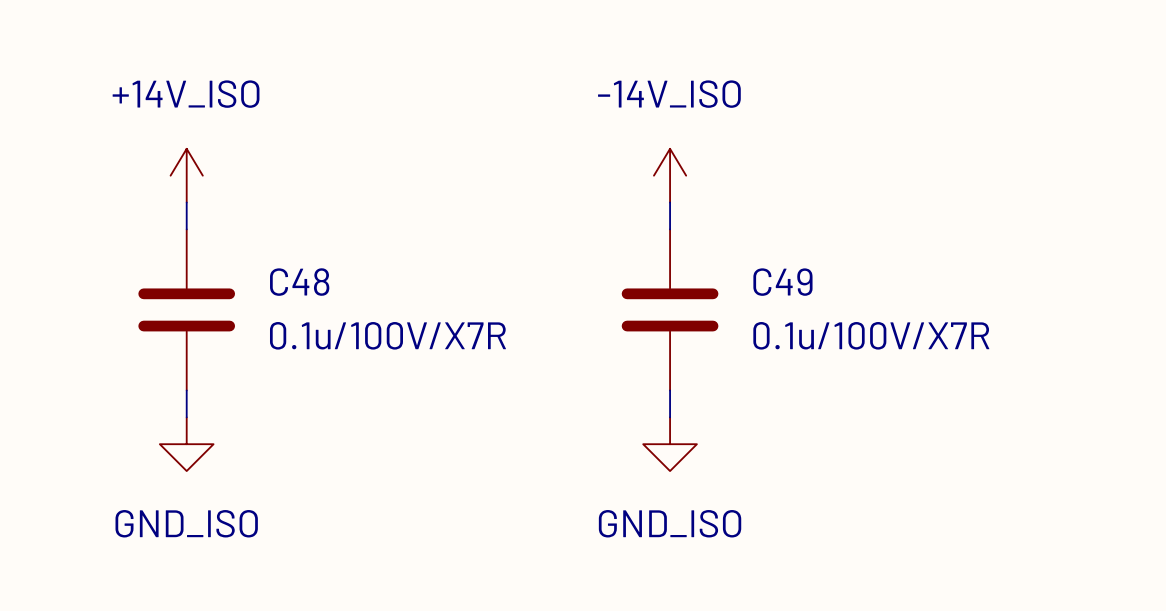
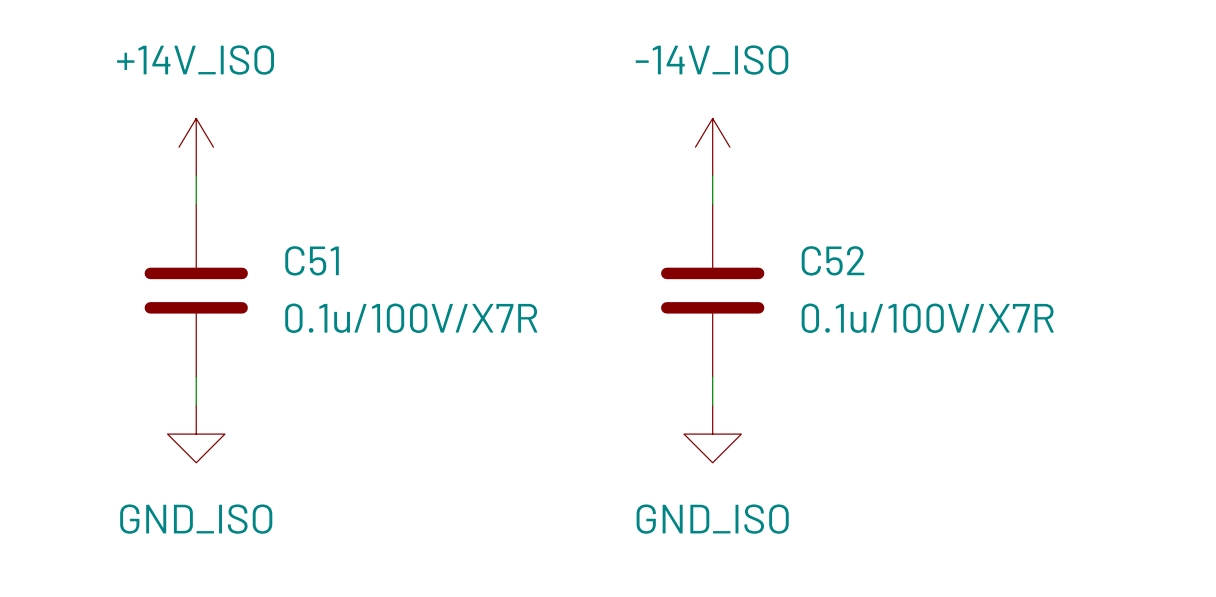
C48 name: C48 (299, 282) -> C51 (312, 260)
C49 name: C49 (782, 282) -> C52 (833, 260)

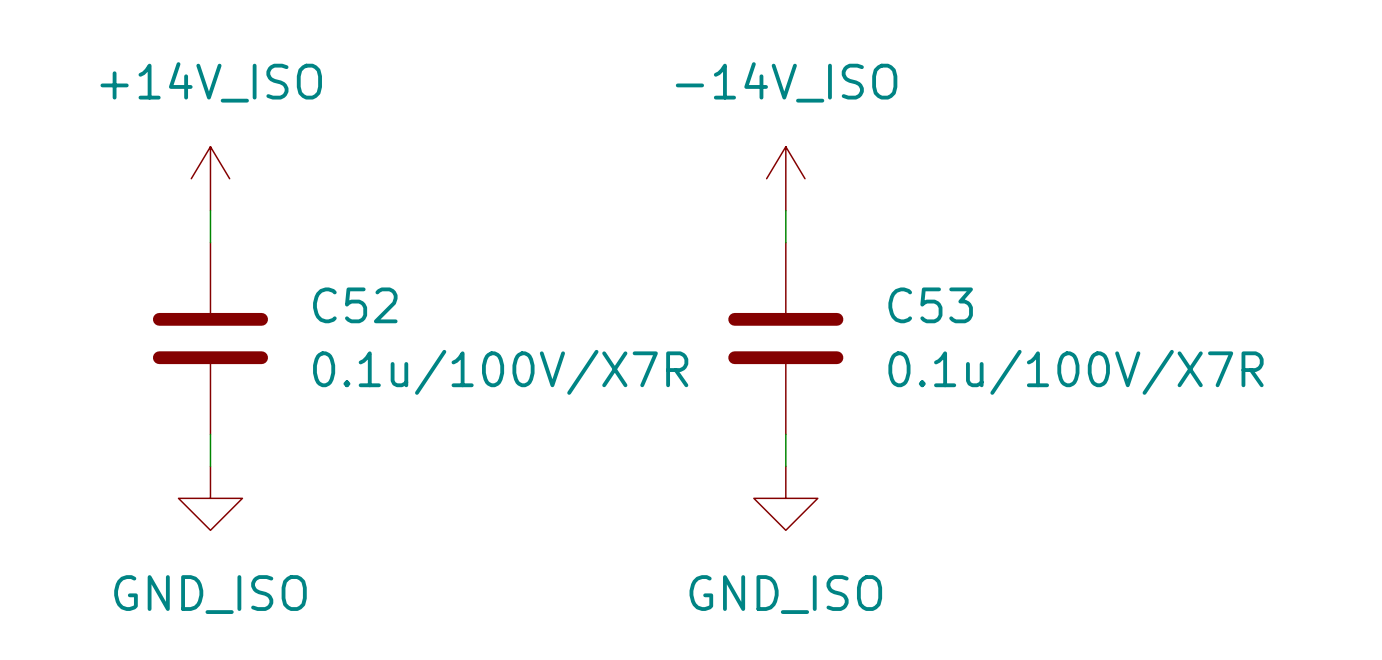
C51 name: C51 (312, 260) -> C52 (355, 305)
C52 name: C52 (833, 260) -> C53 (930, 305)

